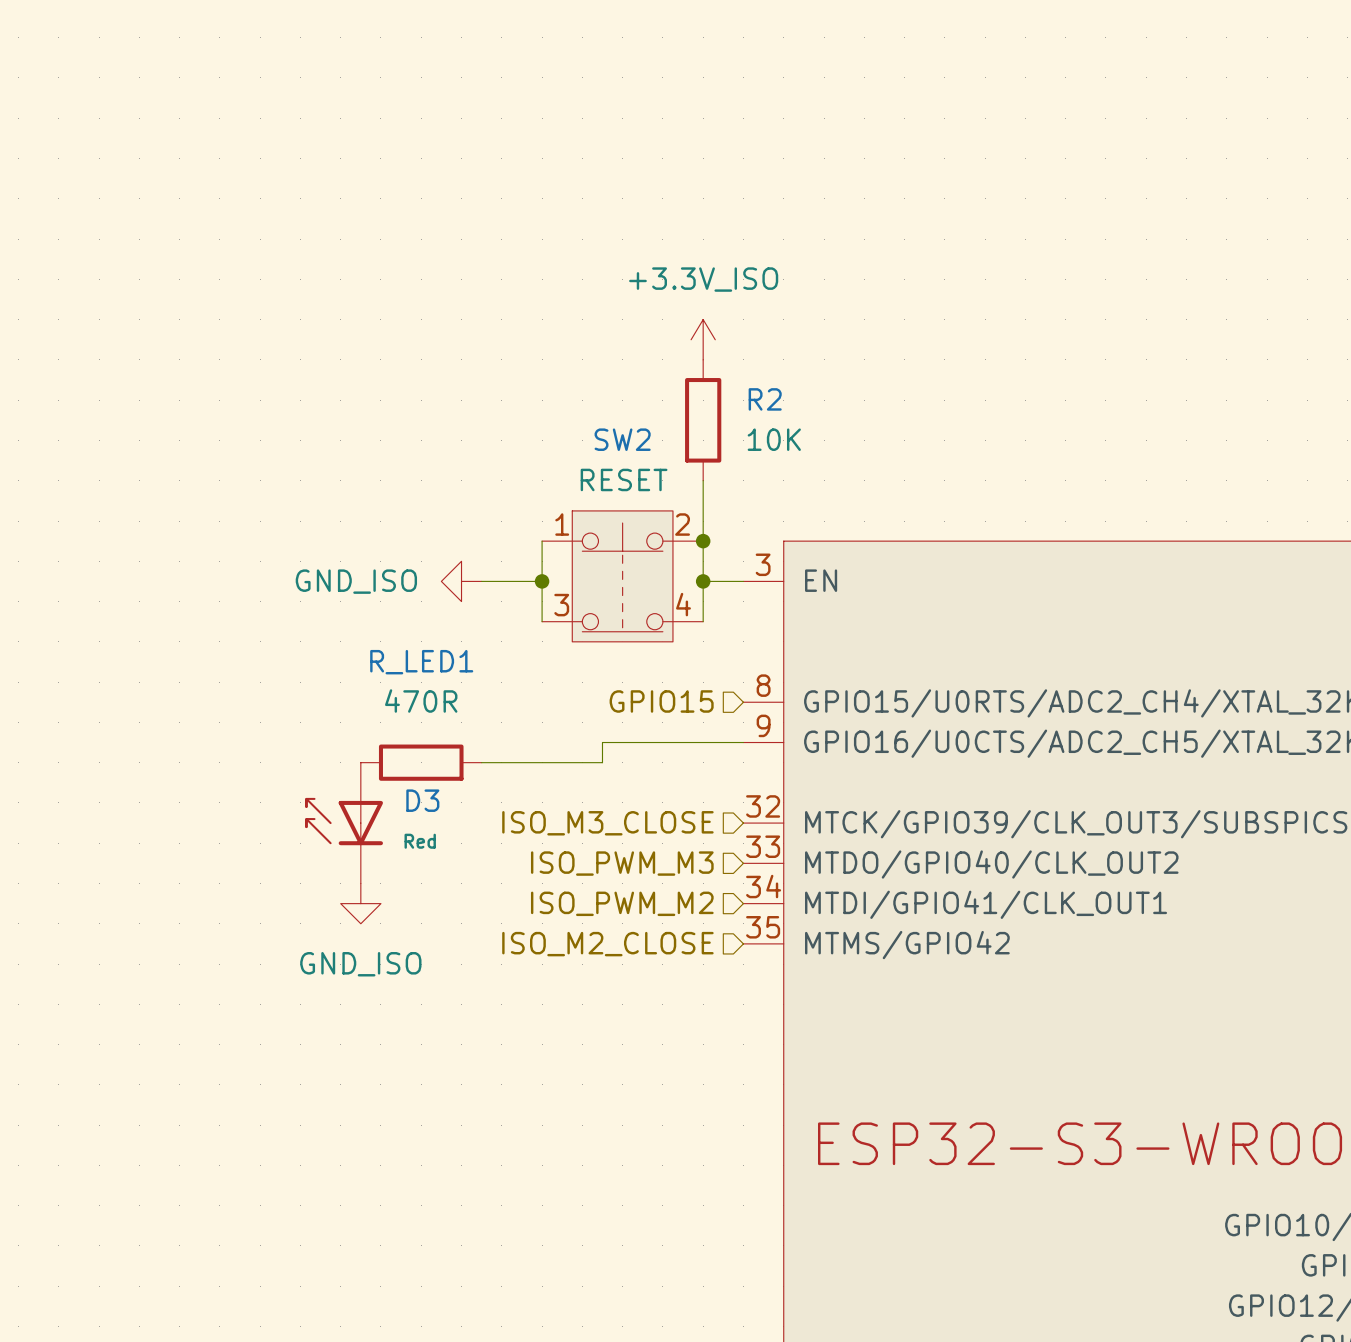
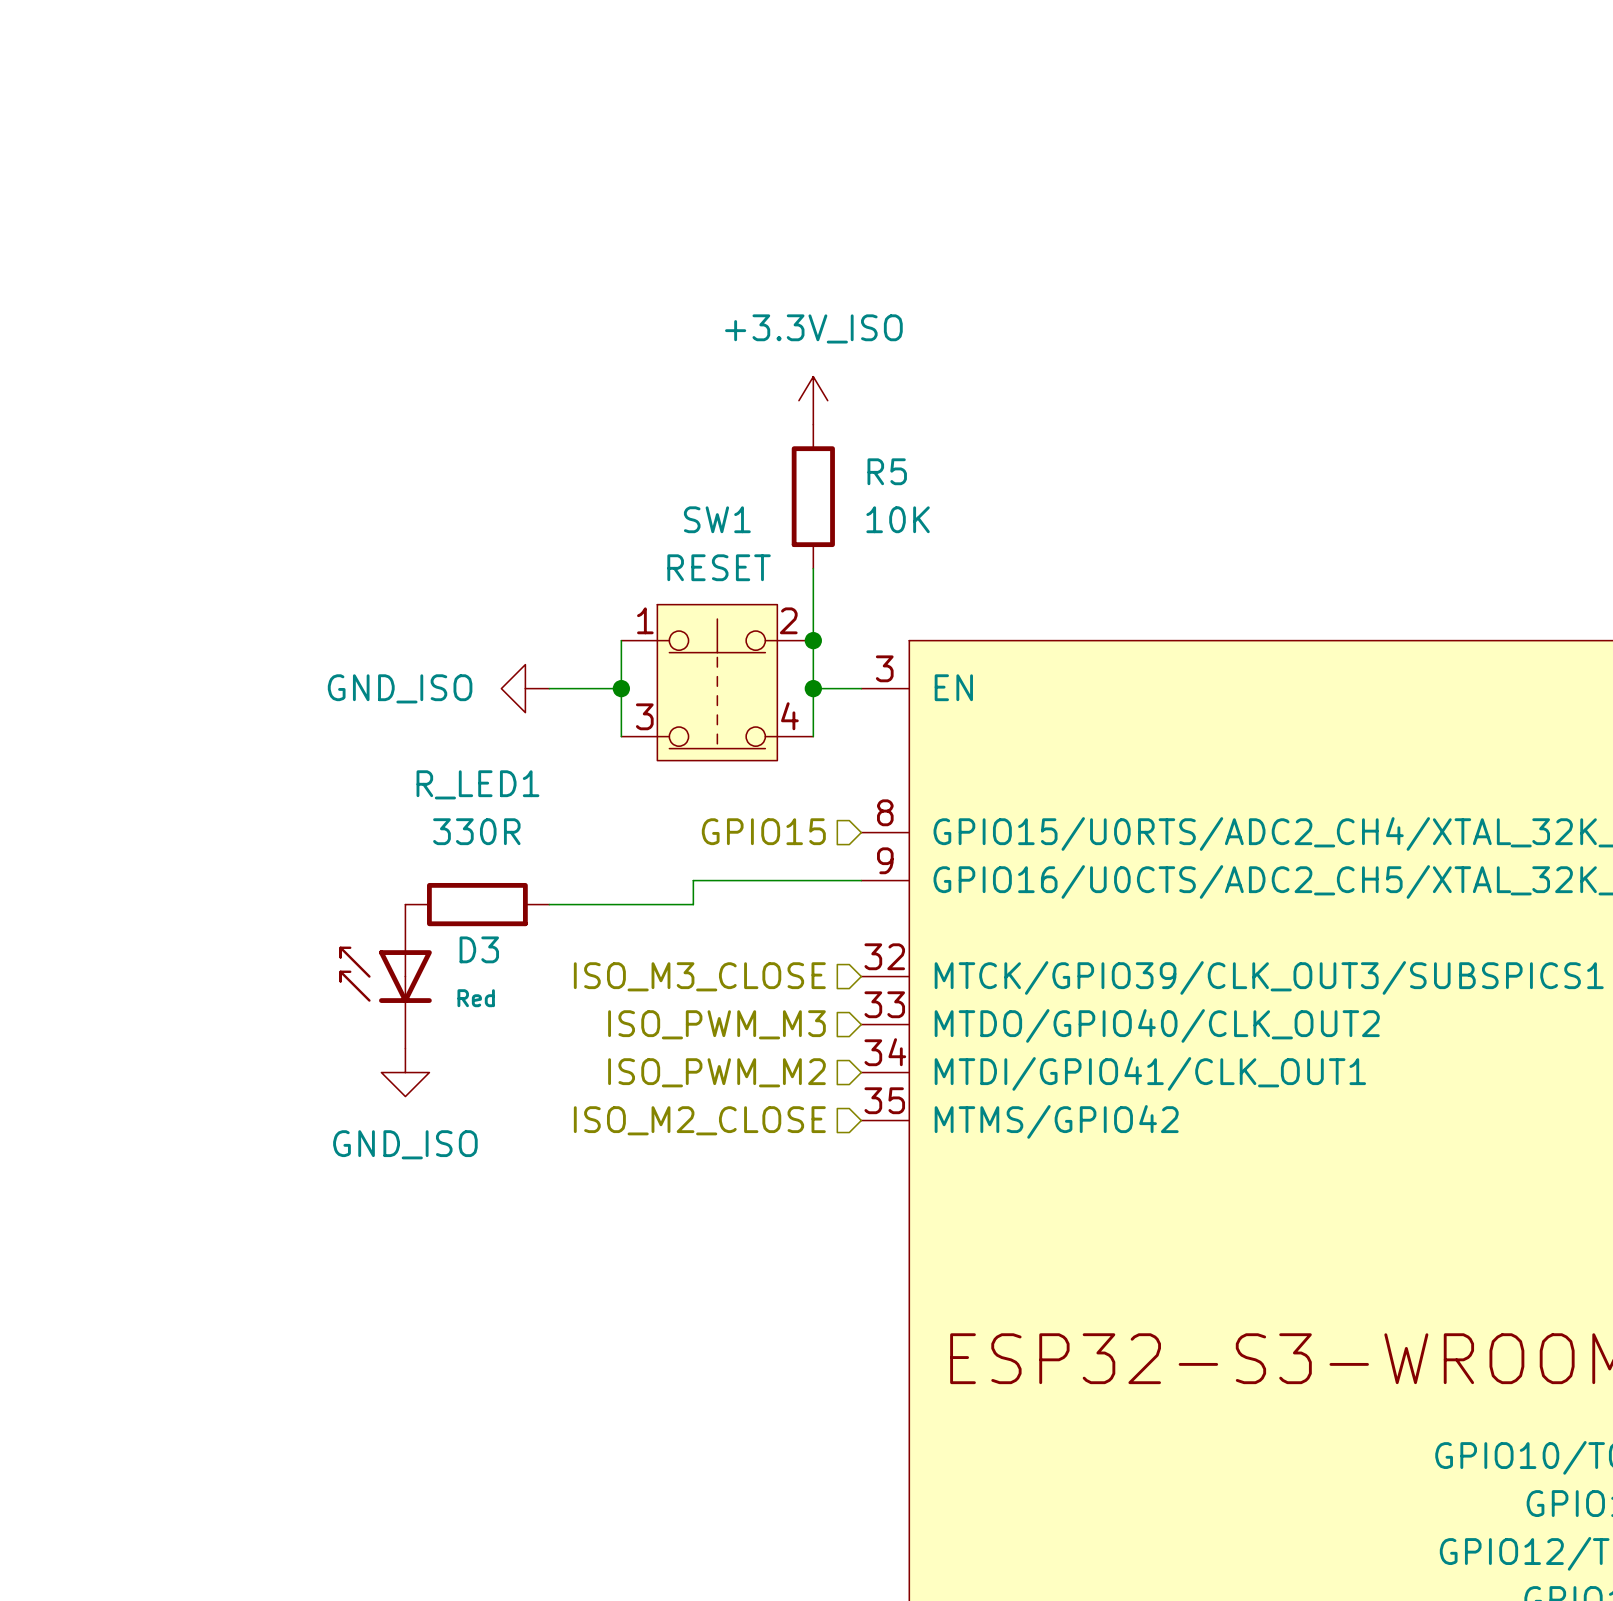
R2 name: R2 (765, 399) -> R5 (887, 471)
SW2 name: SW2 (622, 439) -> SW1 (717, 519)
R_LED1 value: 470R (421, 701) -> 330R (476, 831)

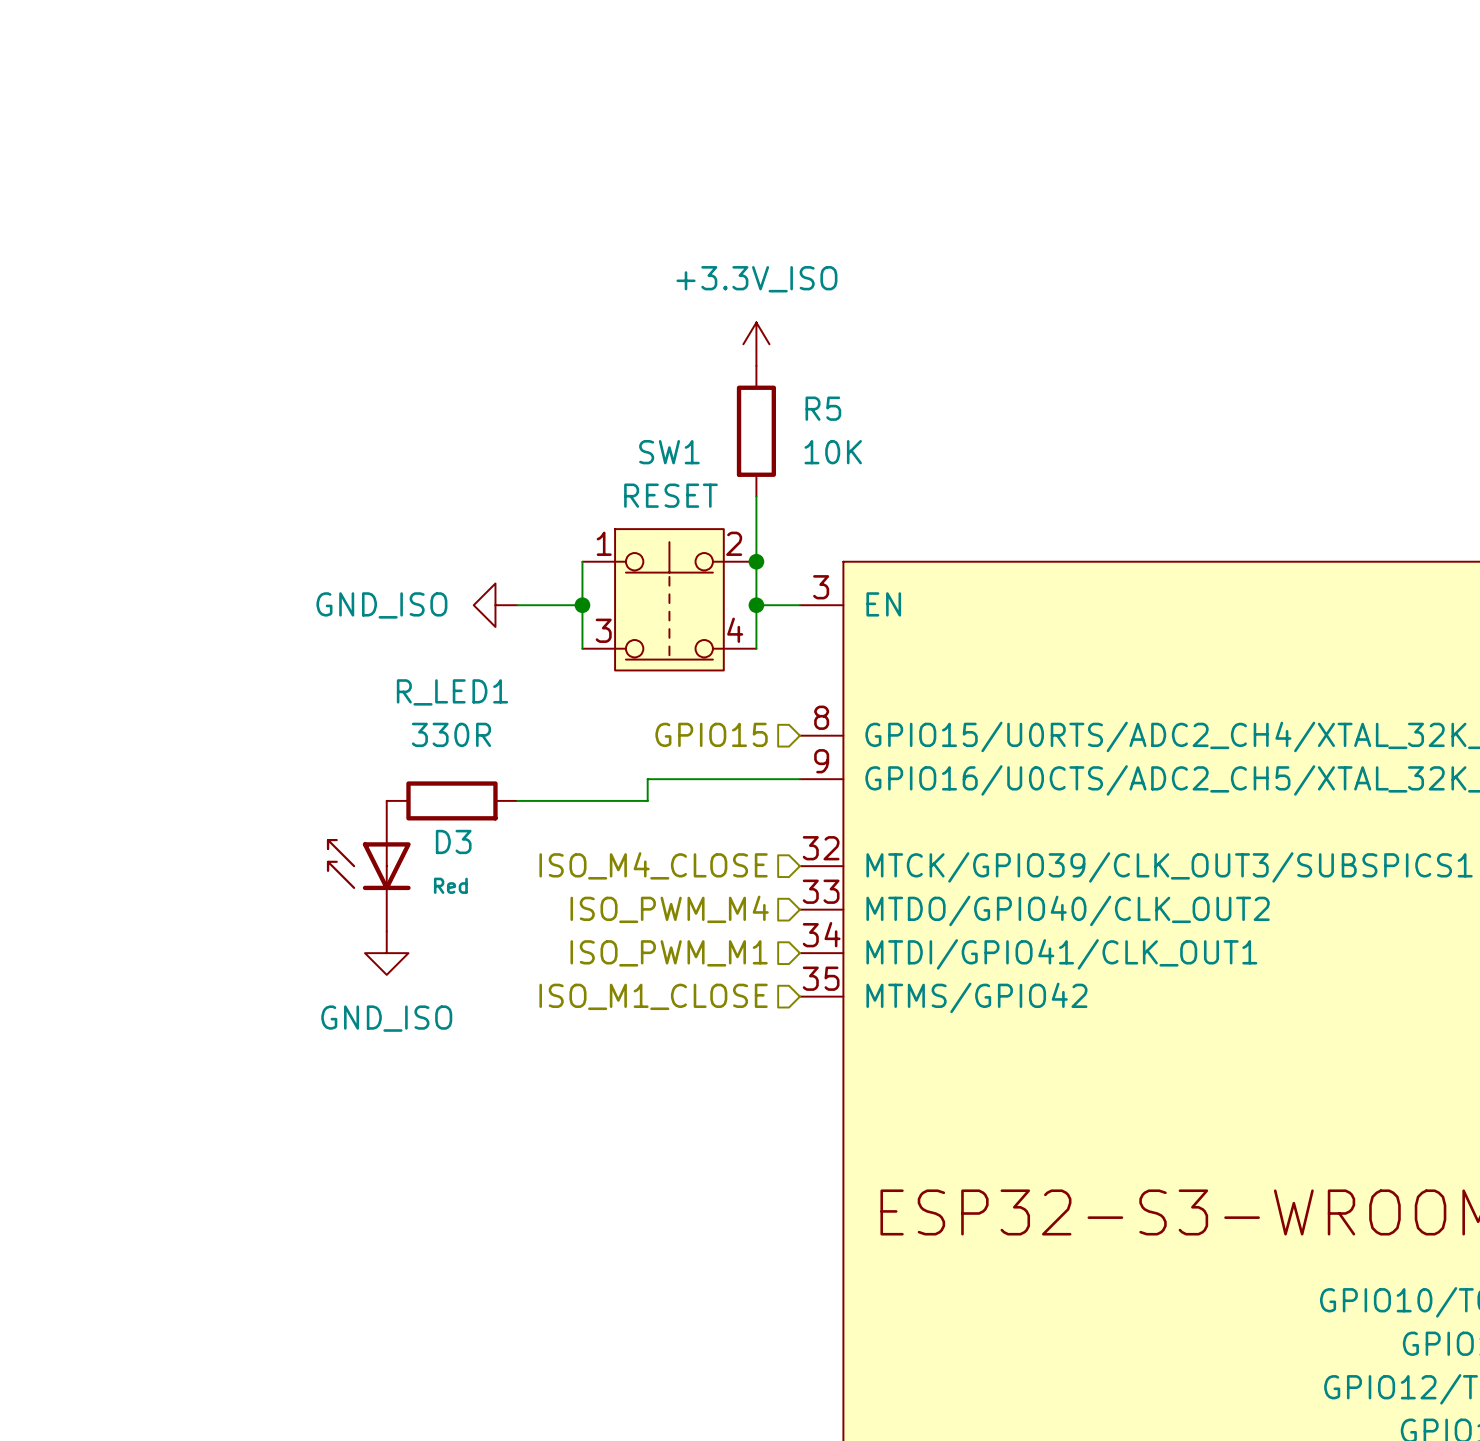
hierarchical label: ISO_M3_CLOSE (699, 976) -> ISO_M4_CLOSE (653, 865)
hierarchical label: ISO_PWM_M3 (716, 1024) -> ISO_PWM_M4 (669, 909)
hierarchical label: ISO_PWM_M2 (716, 1072) -> ISO_PWM_M1 (669, 953)
hierarchical label: ISO_M2_CLOSE (699, 1120) -> ISO_M1_CLOSE (653, 996)

